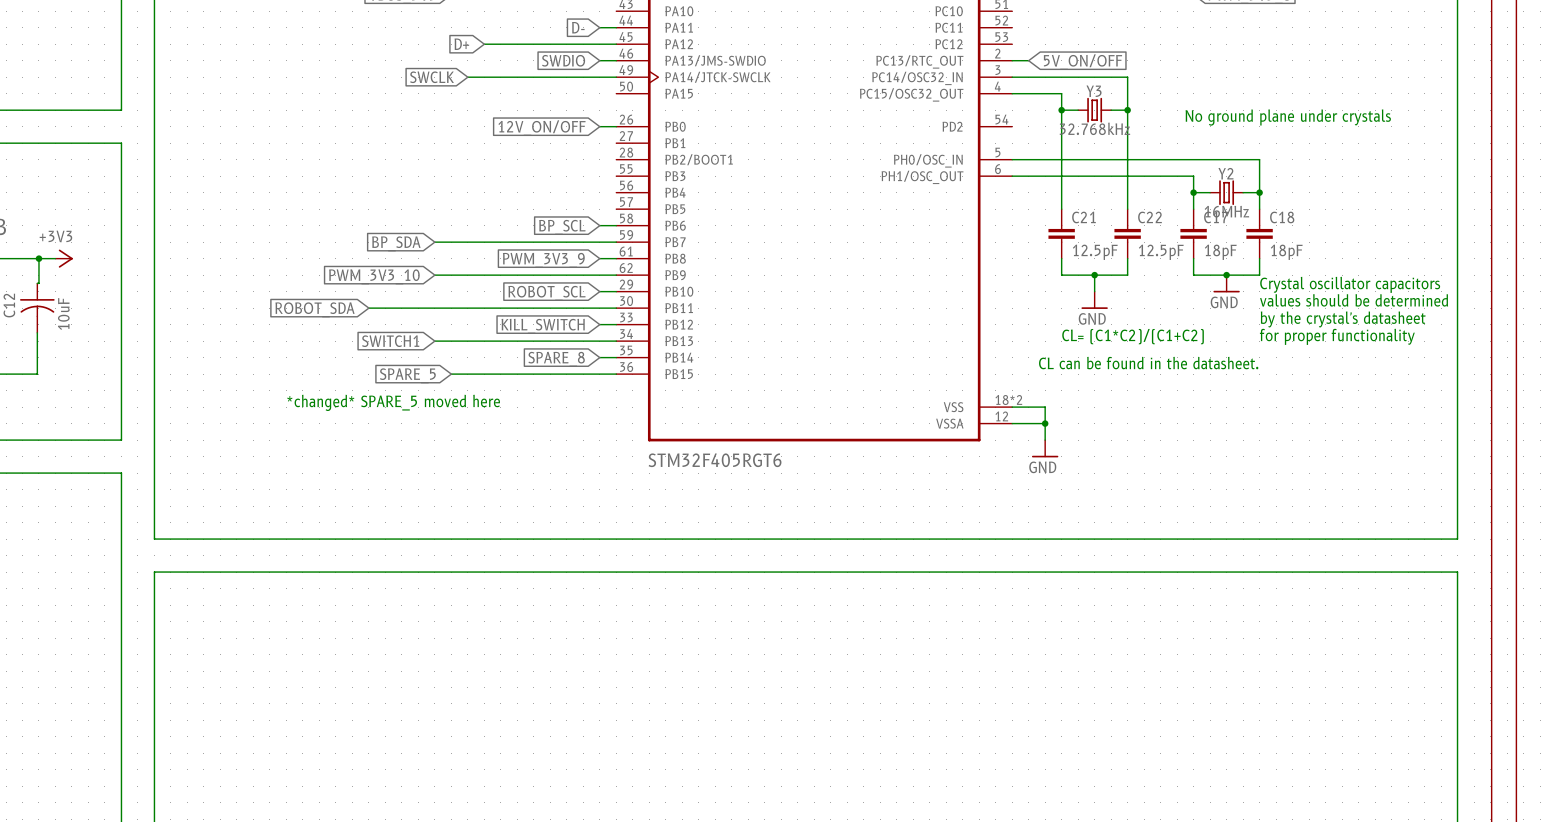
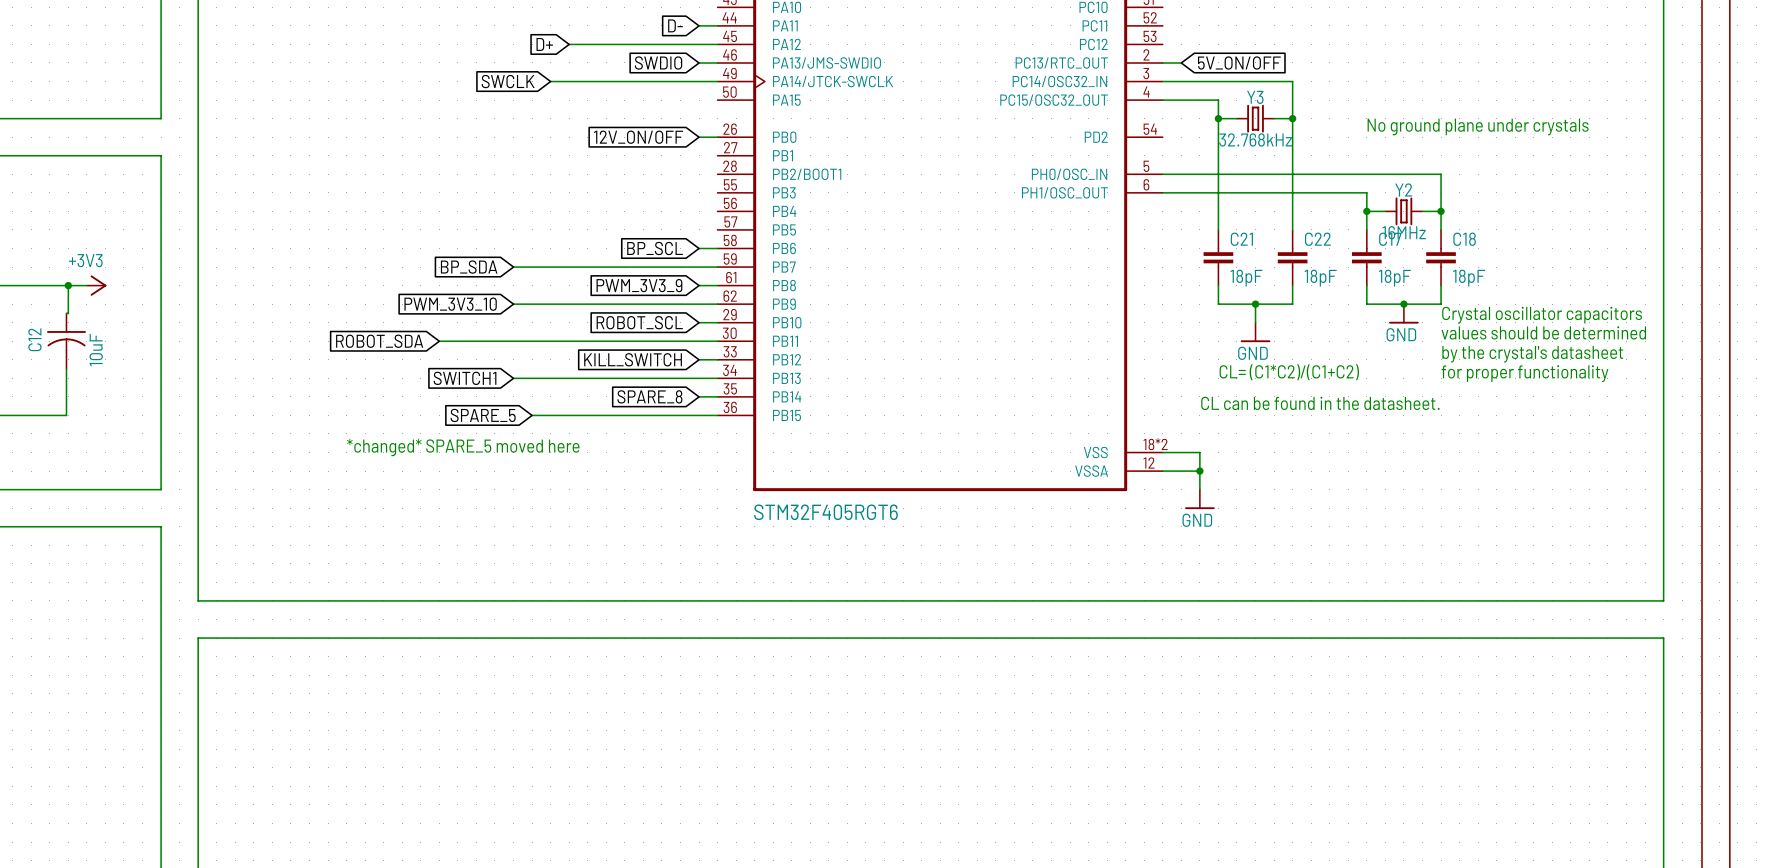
C21 value: 12.5pF (1095, 252) -> 18pF (1246, 278)
C22 value: 12.5pF (1161, 252) -> 18pF (1320, 278)

